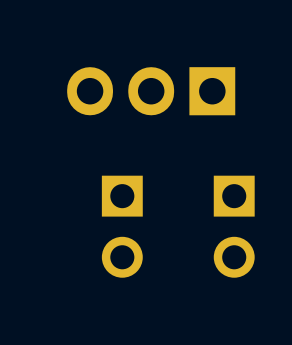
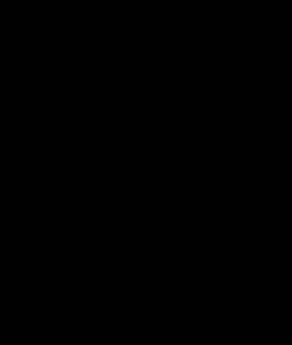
part: (151, 91) -> none
part: (122, 226) -> none
part: (234, 226) -> none

